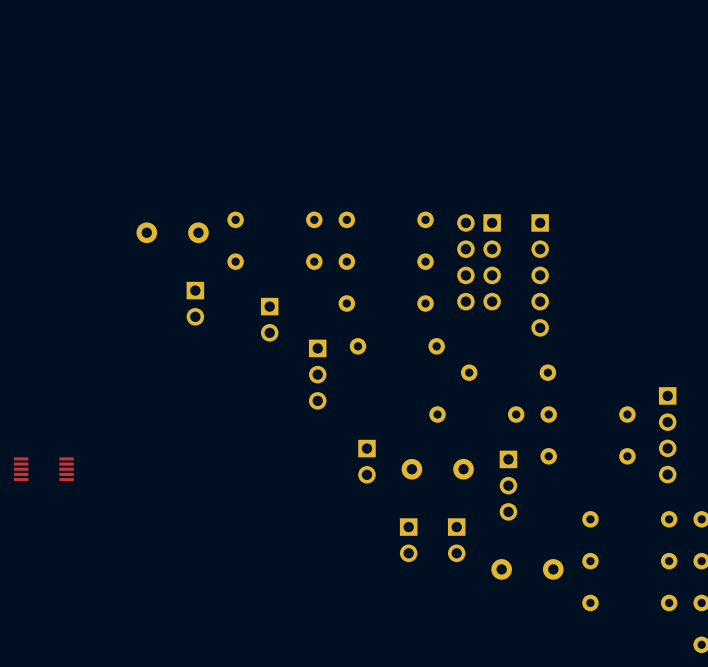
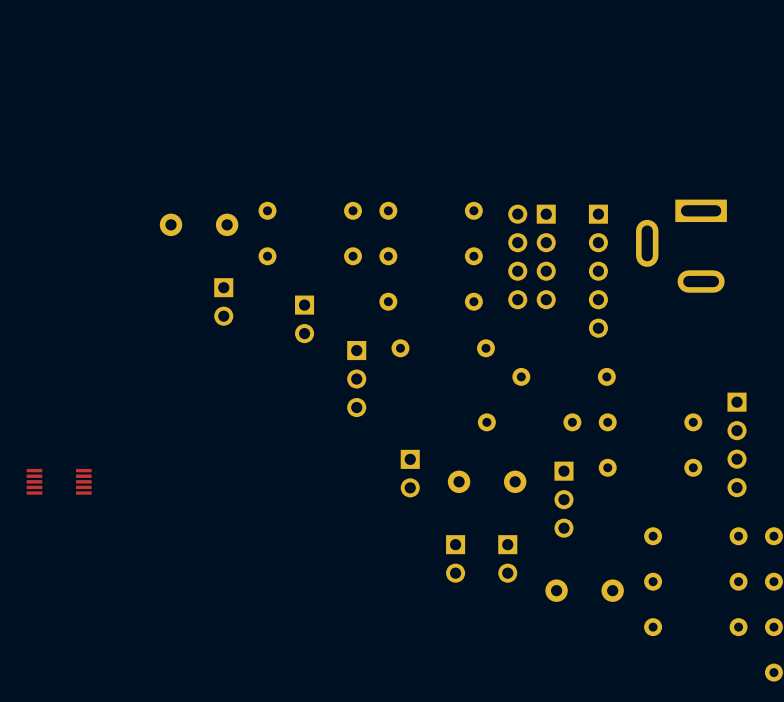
part: none -> (681, 246)

